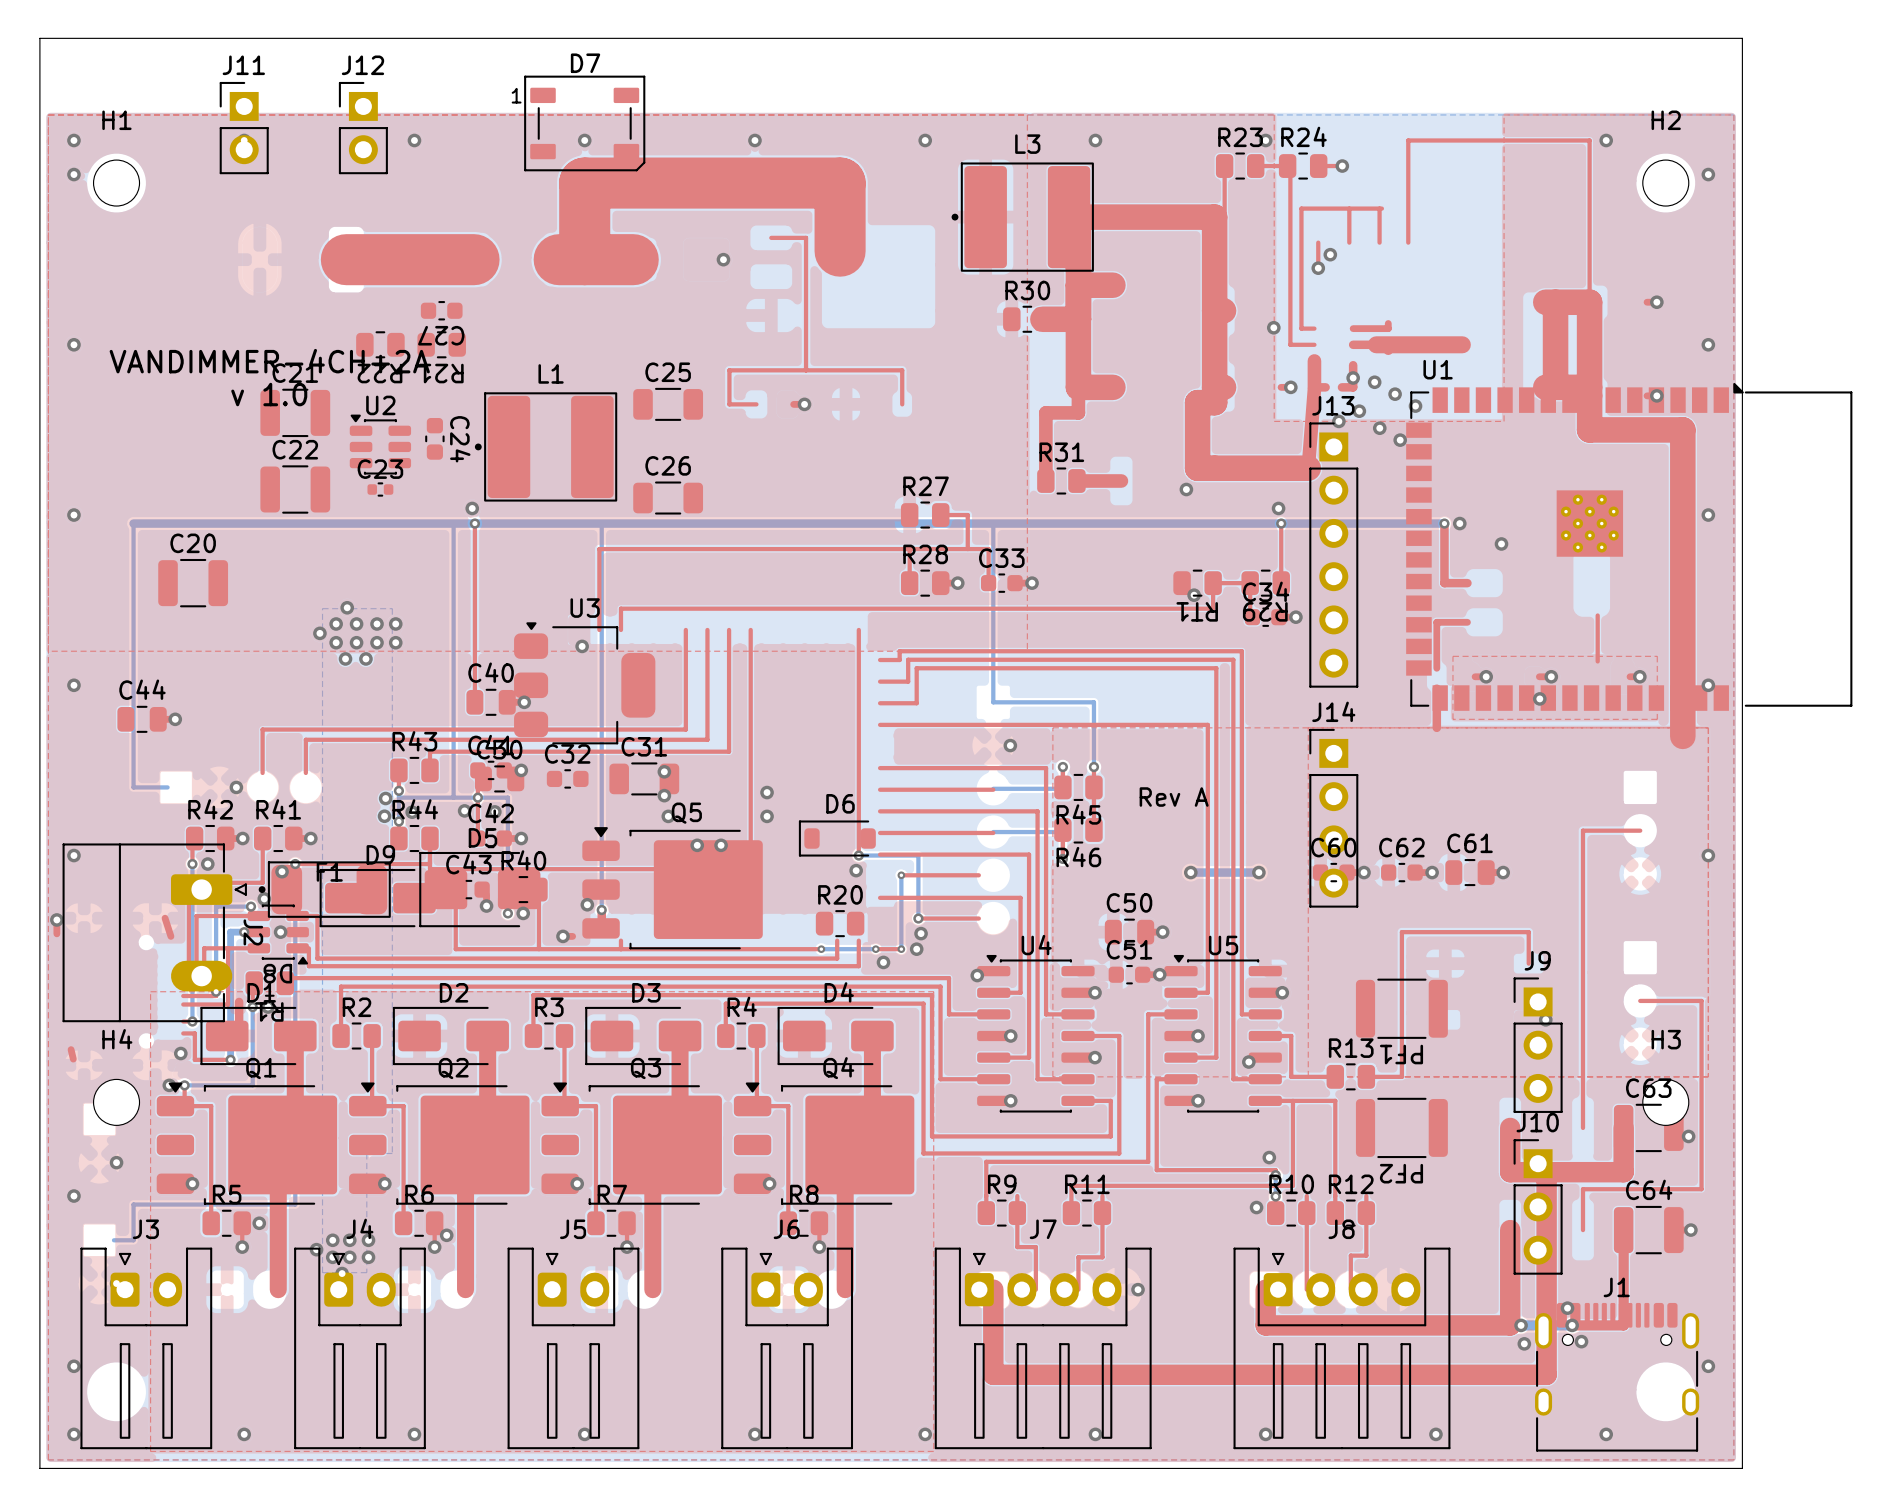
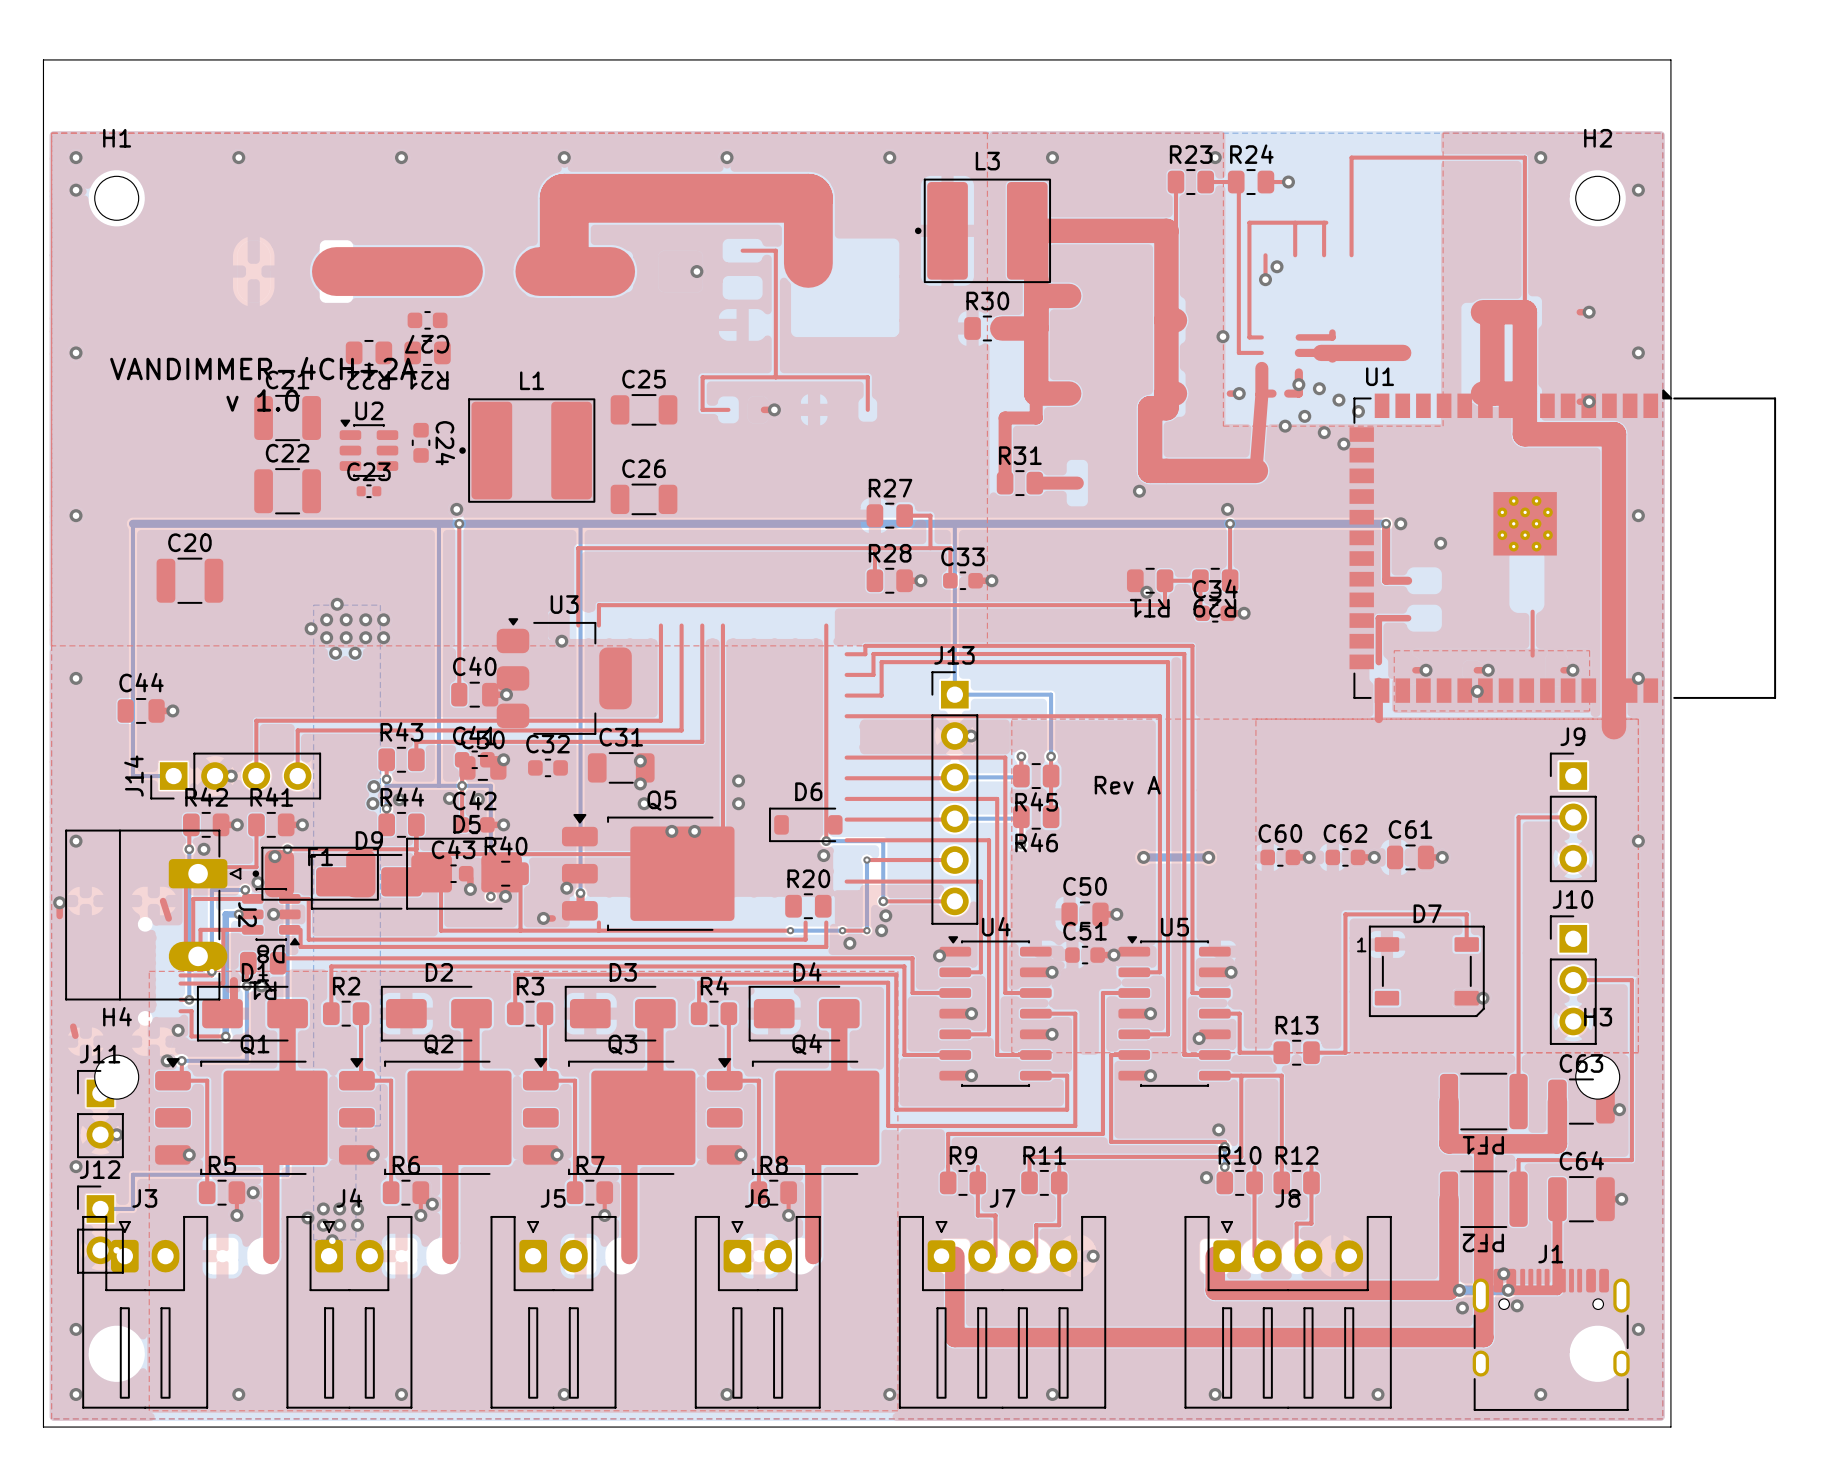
D7 position: (584, 123) -> (1426, 971)
J11 position: (244, 128) -> (100, 1114)
J12 position: (363, 128) -> (100, 1229)
J13 position: (1333, 555) -> (954, 798)
J14 rotation: 0° (1333, 818) -> 90° counterclockwise (235, 776)
J14 position: (1333, 818) -> (235, 776)
PF1 position: (1401, 1008) -> (1483, 1101)
J9 position: (1538, 1045) -> (1573, 817)
PF2 position: (1401, 1127) -> (1483, 1199)
J10 position: (1538, 1206) -> (1573, 980)

